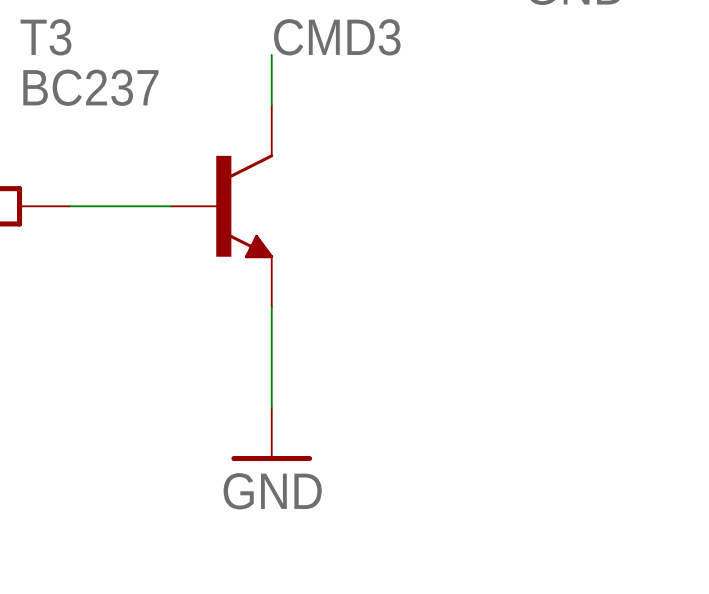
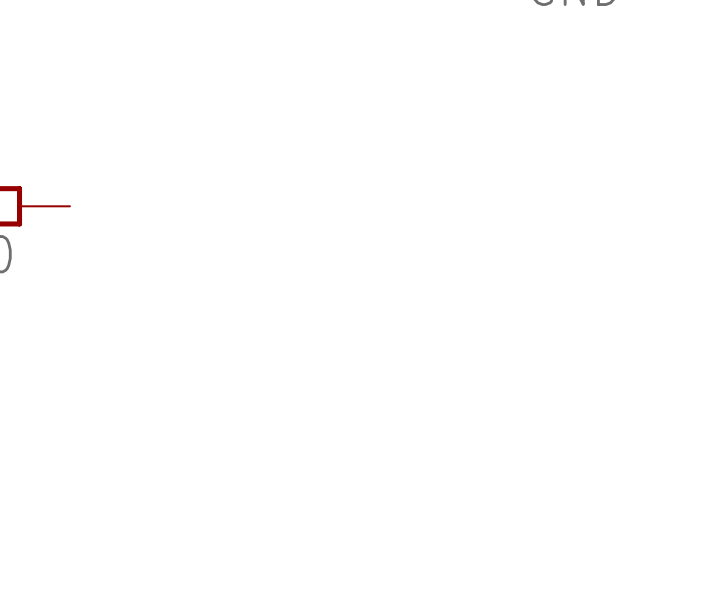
label: CMD3 (337, 37) -> none
wire: (271, 54) (271, 105) -> none
wire: (69, 206) (170, 206) -> none
T3: BC237 (222, 206) -> none
wire: (271, 307) (271, 408) -> none
power symbol: GND (271, 434) -> none

